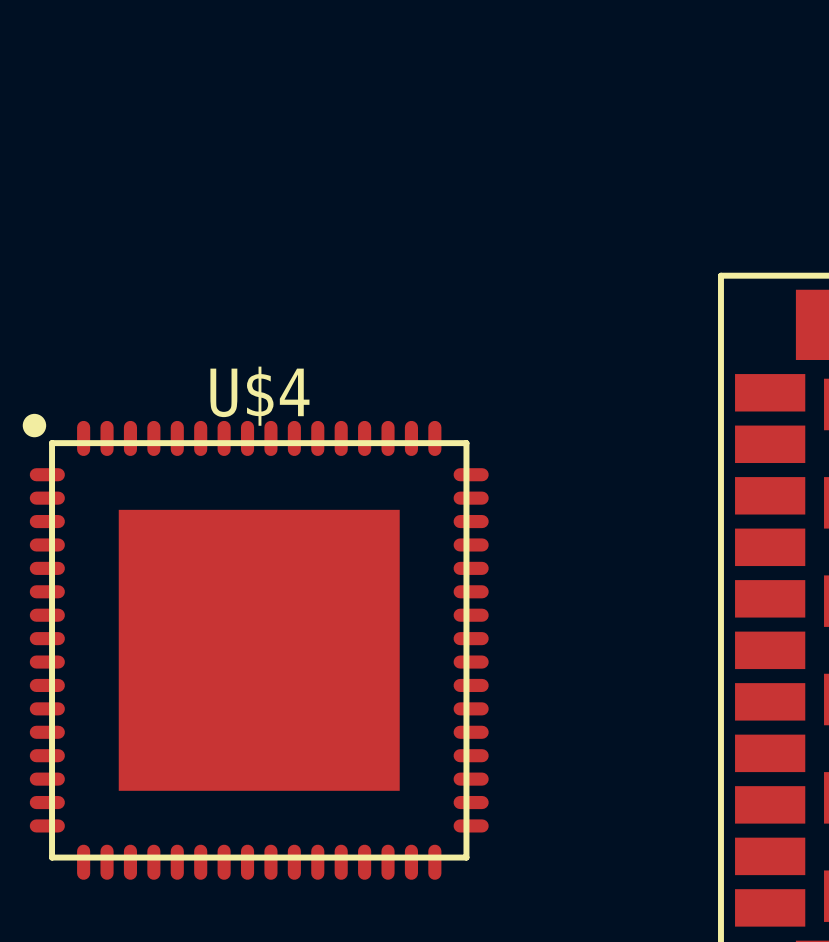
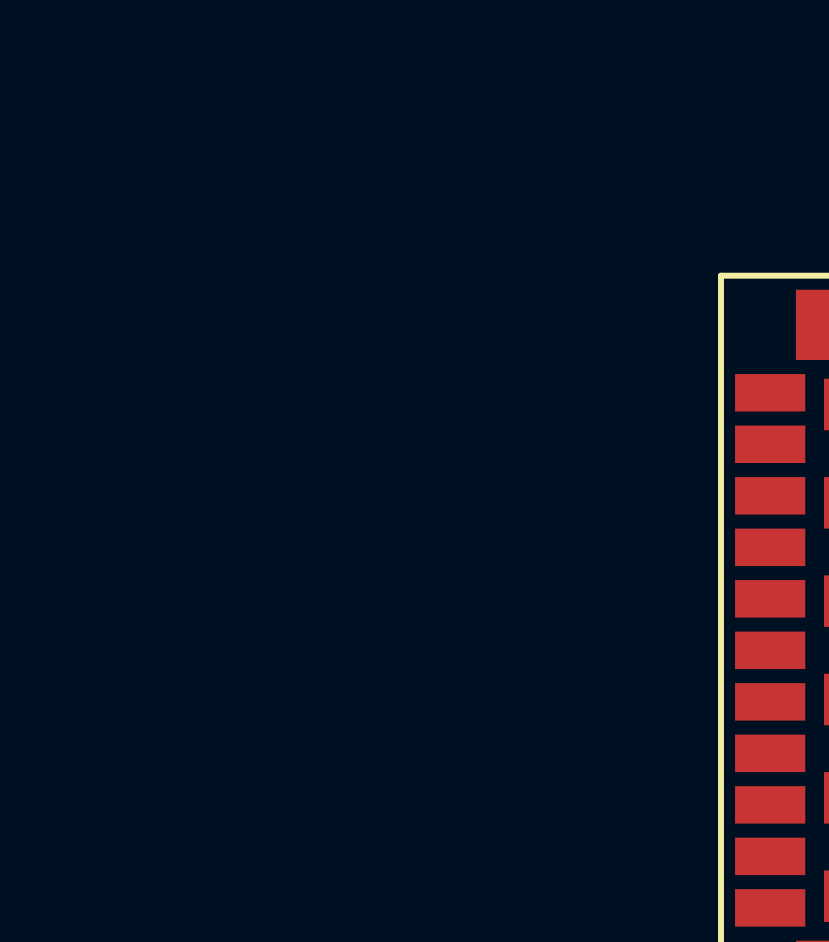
U$4: (255, 646) -> none

